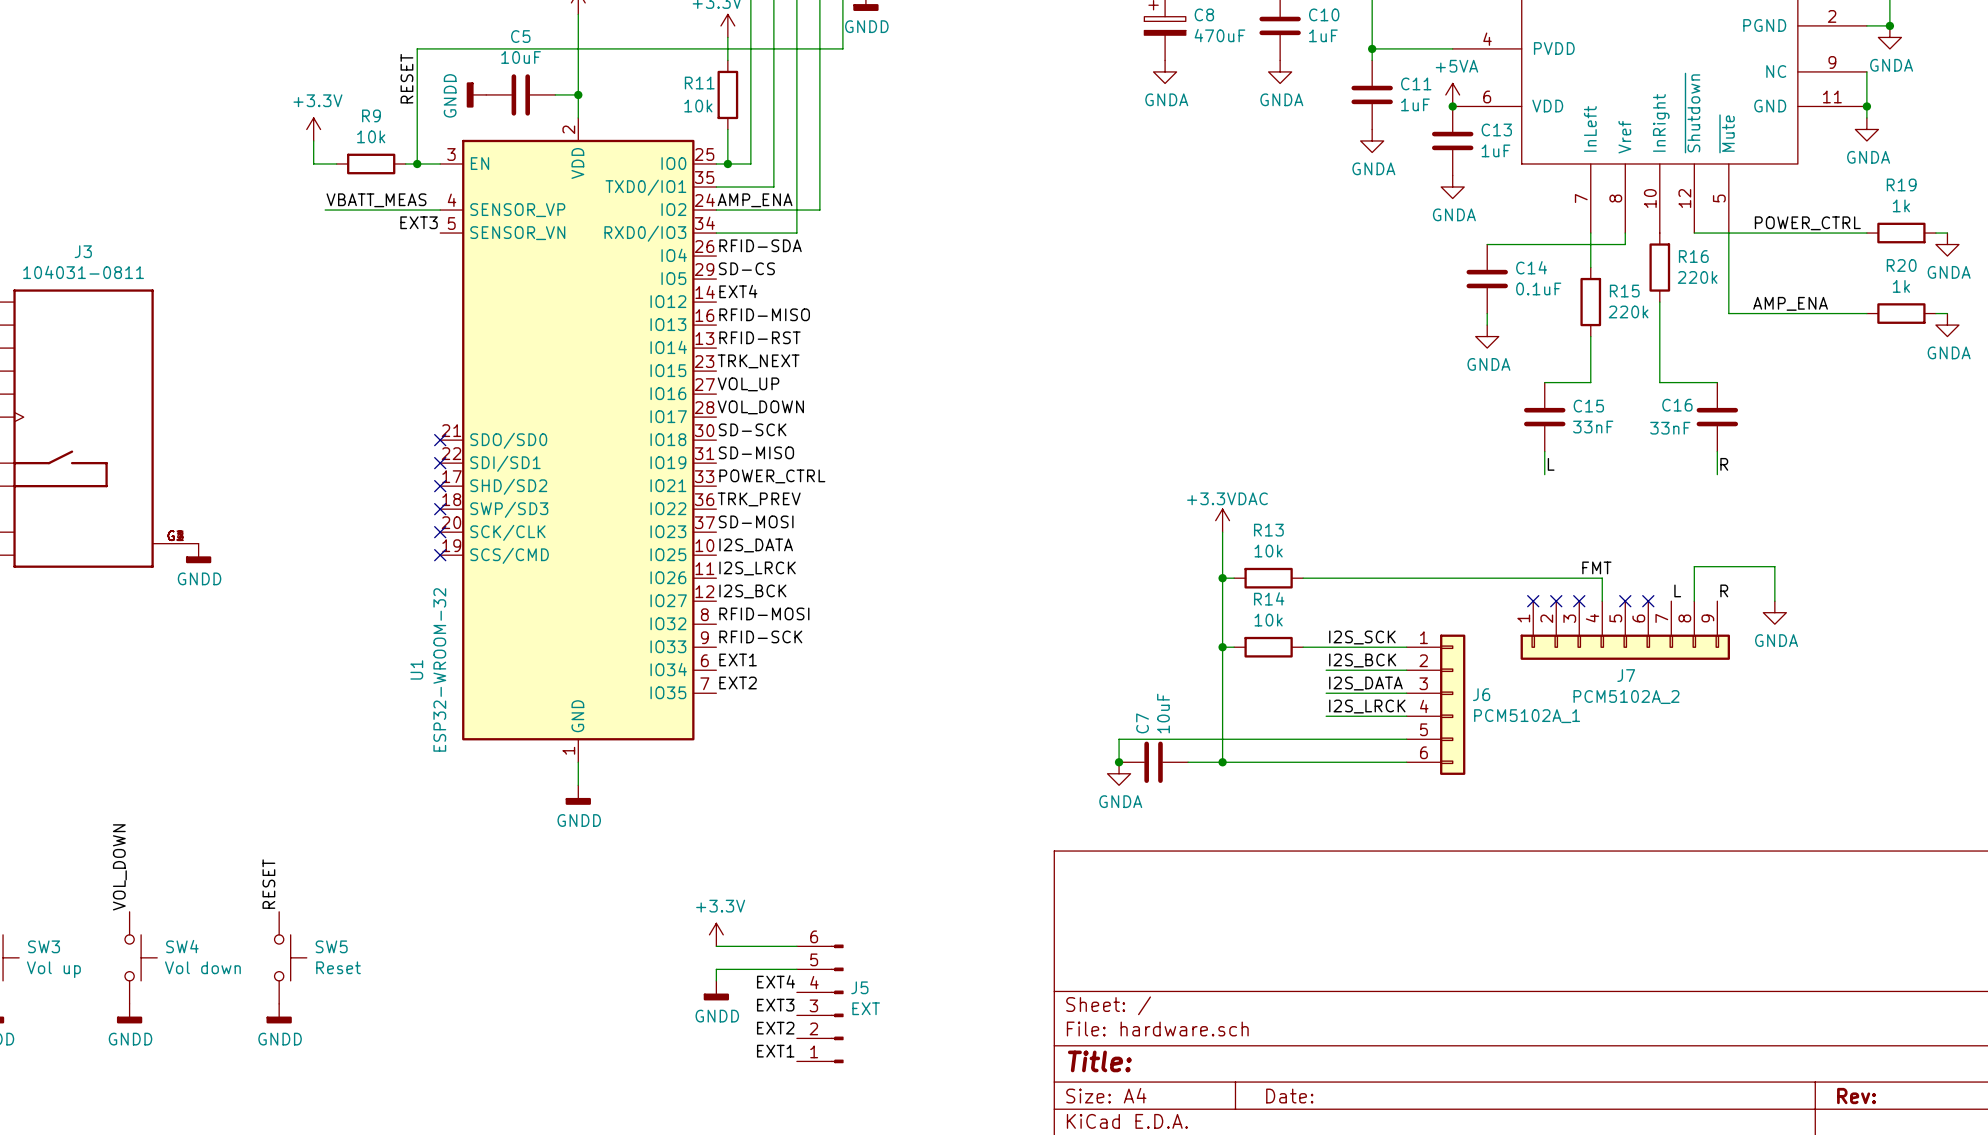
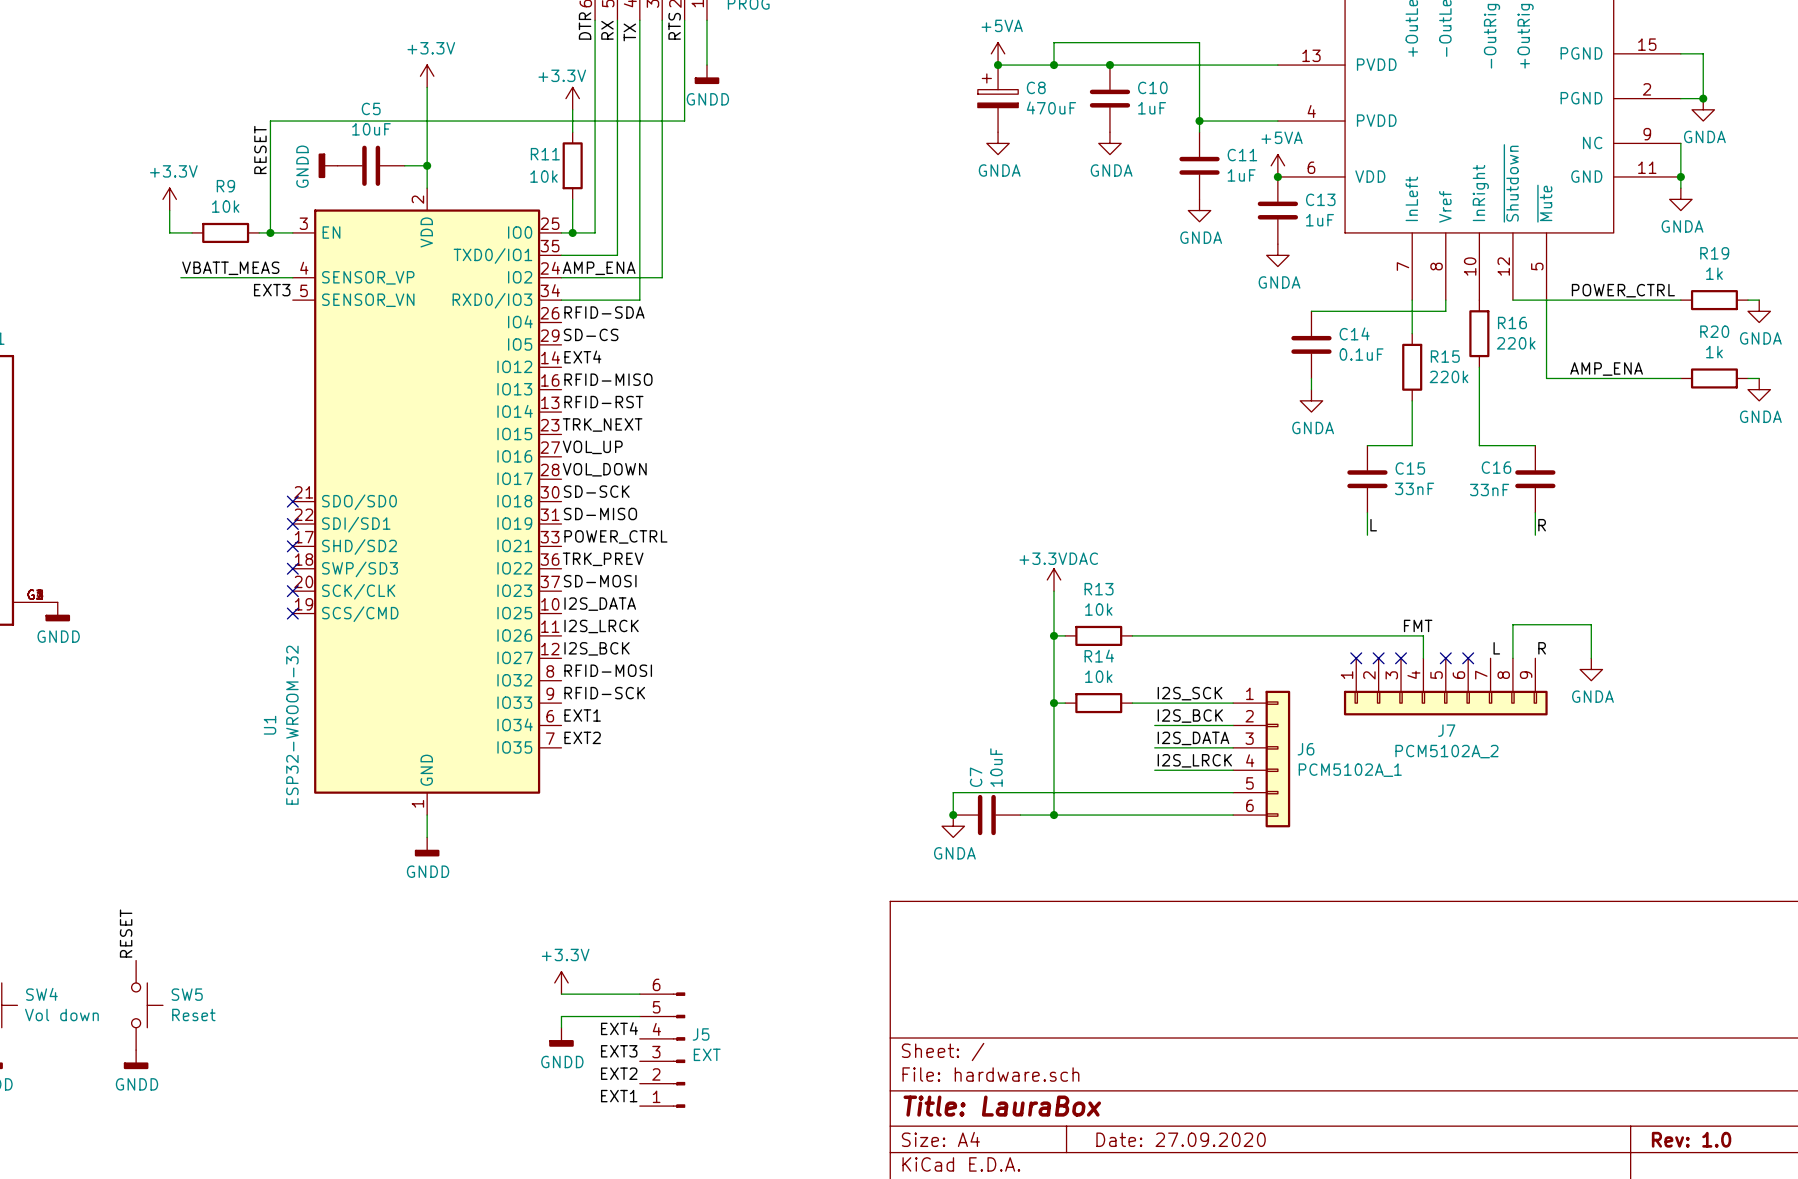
title block: Title: (1099, 1061) -> Title: LauraBox (1002, 1106)
title block: Date: (1289, 1096) -> Date: 27.09.2020 (1181, 1139)
title block: Rev: (1856, 1096) -> Rev: 1.0 (1691, 1139)

